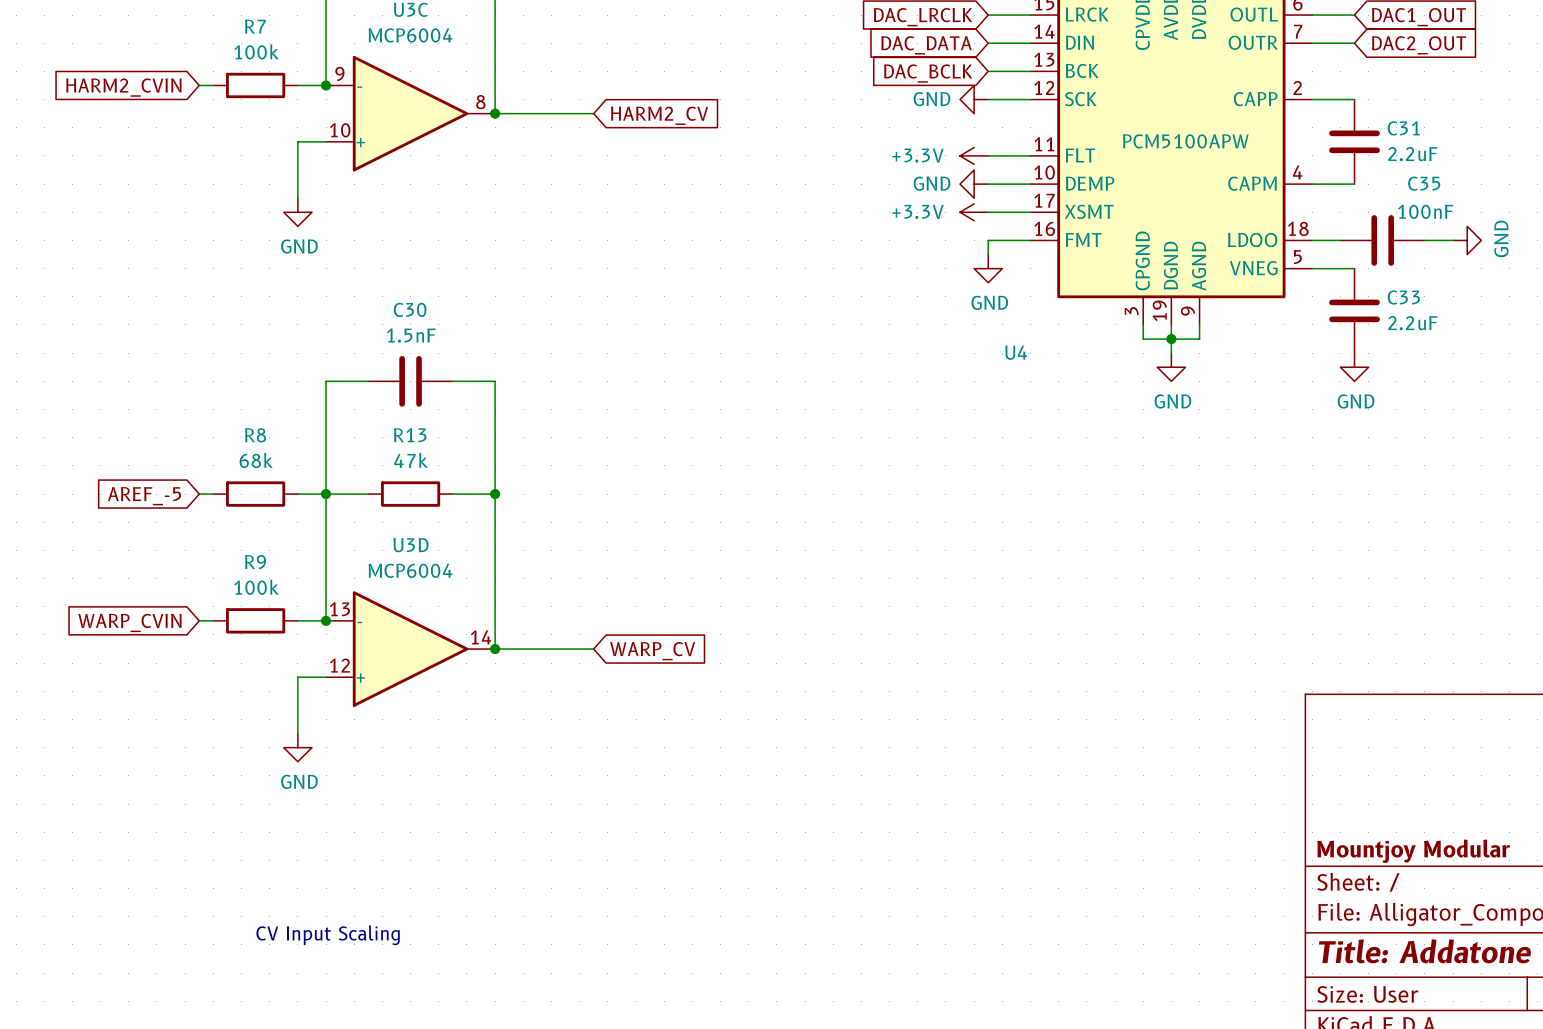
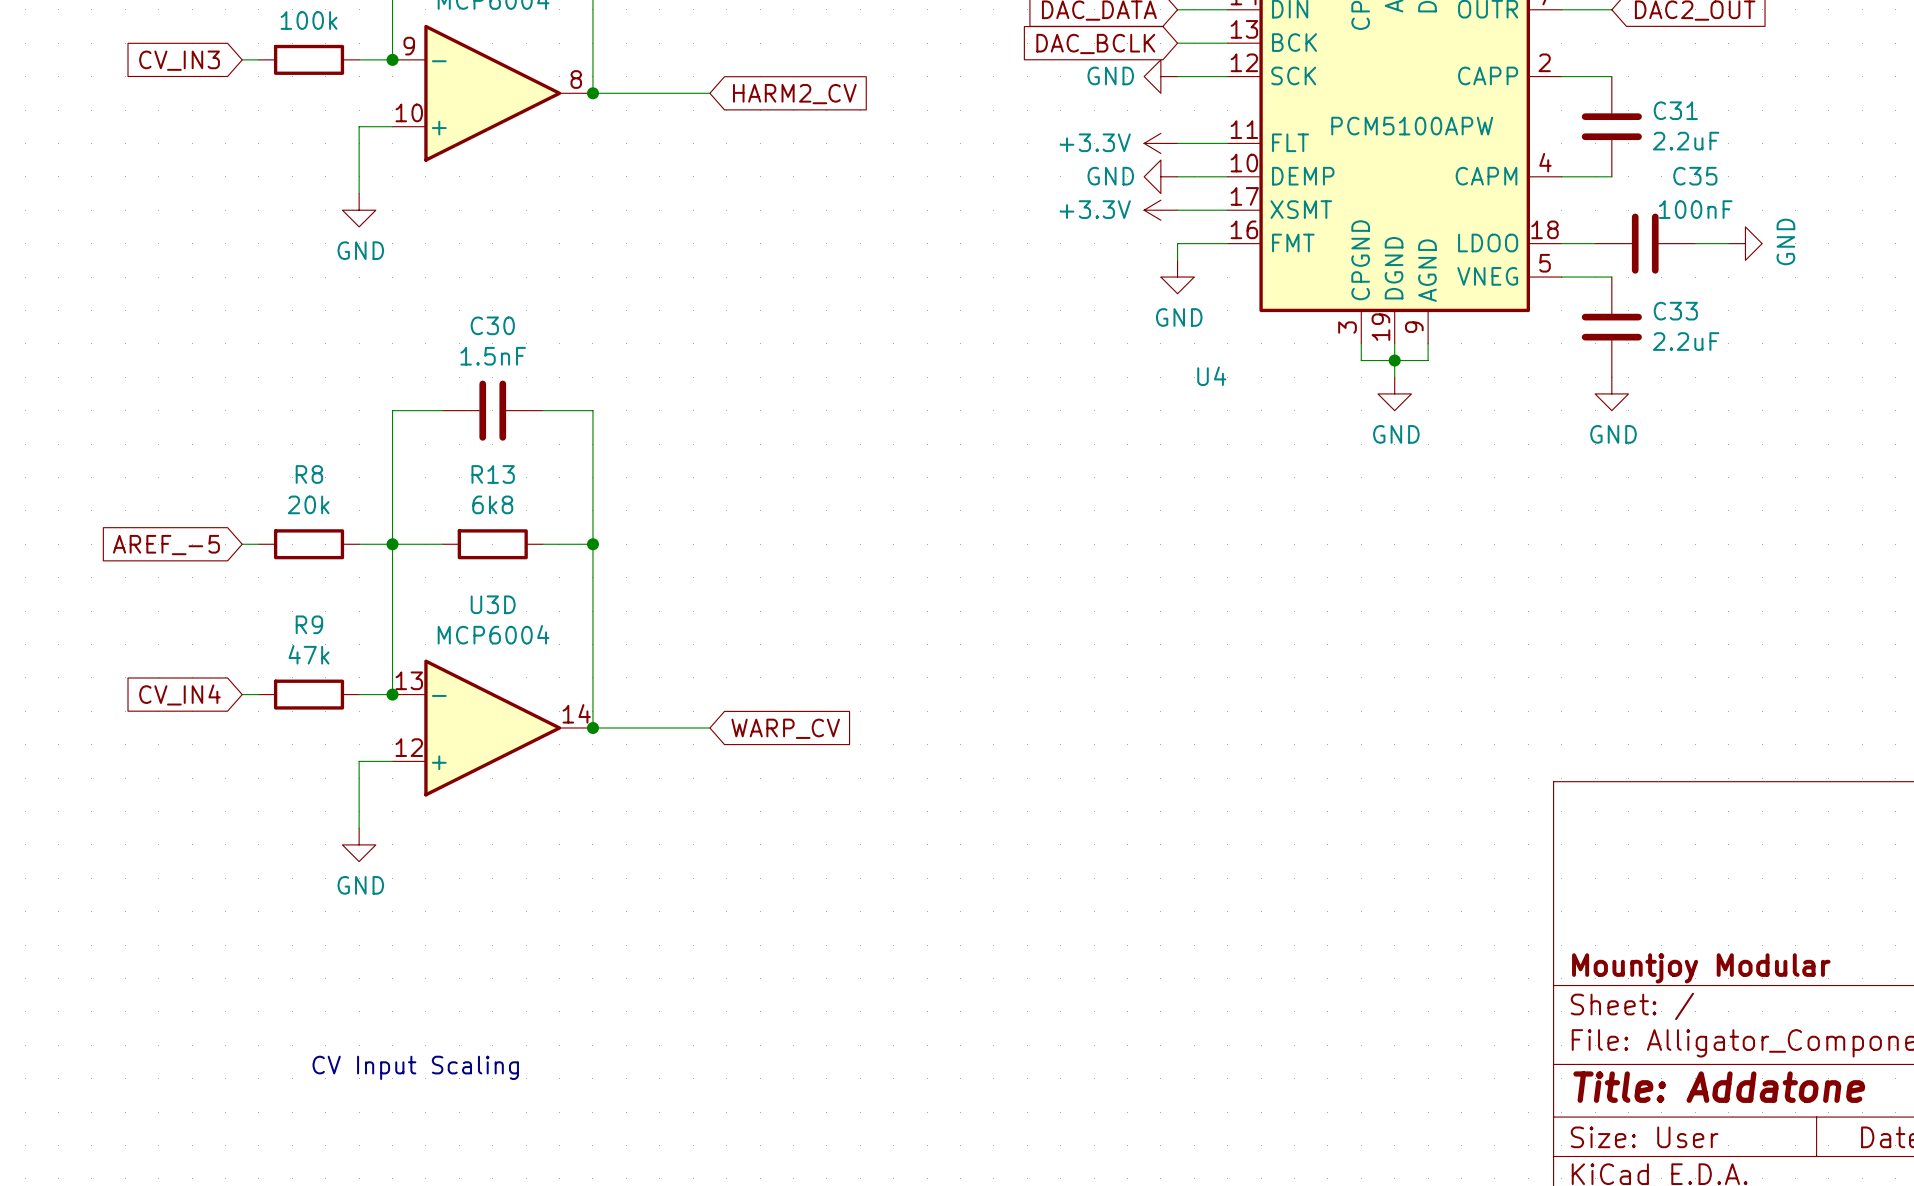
global label: HARM2_CVIN (123, 87) -> CV_IN3 (179, 60)
R8 value: 68k (256, 460) -> 20k (308, 504)
R13 value: 47k (411, 460) -> 6k8 (492, 504)
R9 value: 100k (256, 587) -> 47k (309, 654)
global label: WARP_CVIN (129, 622) -> CV_IN4 (179, 694)

